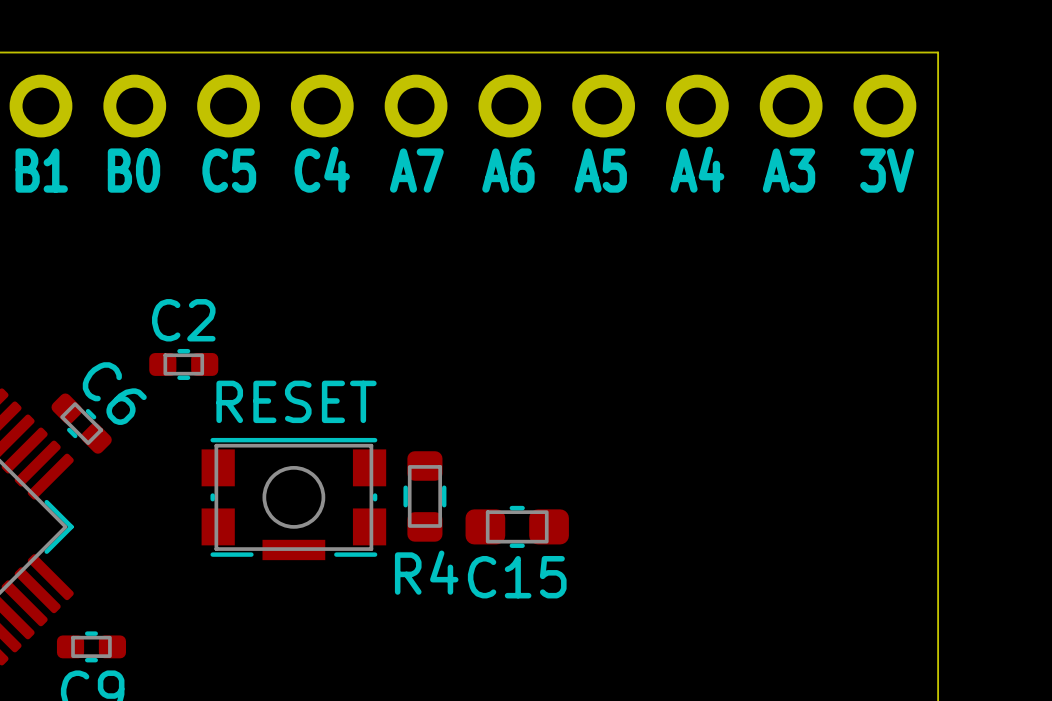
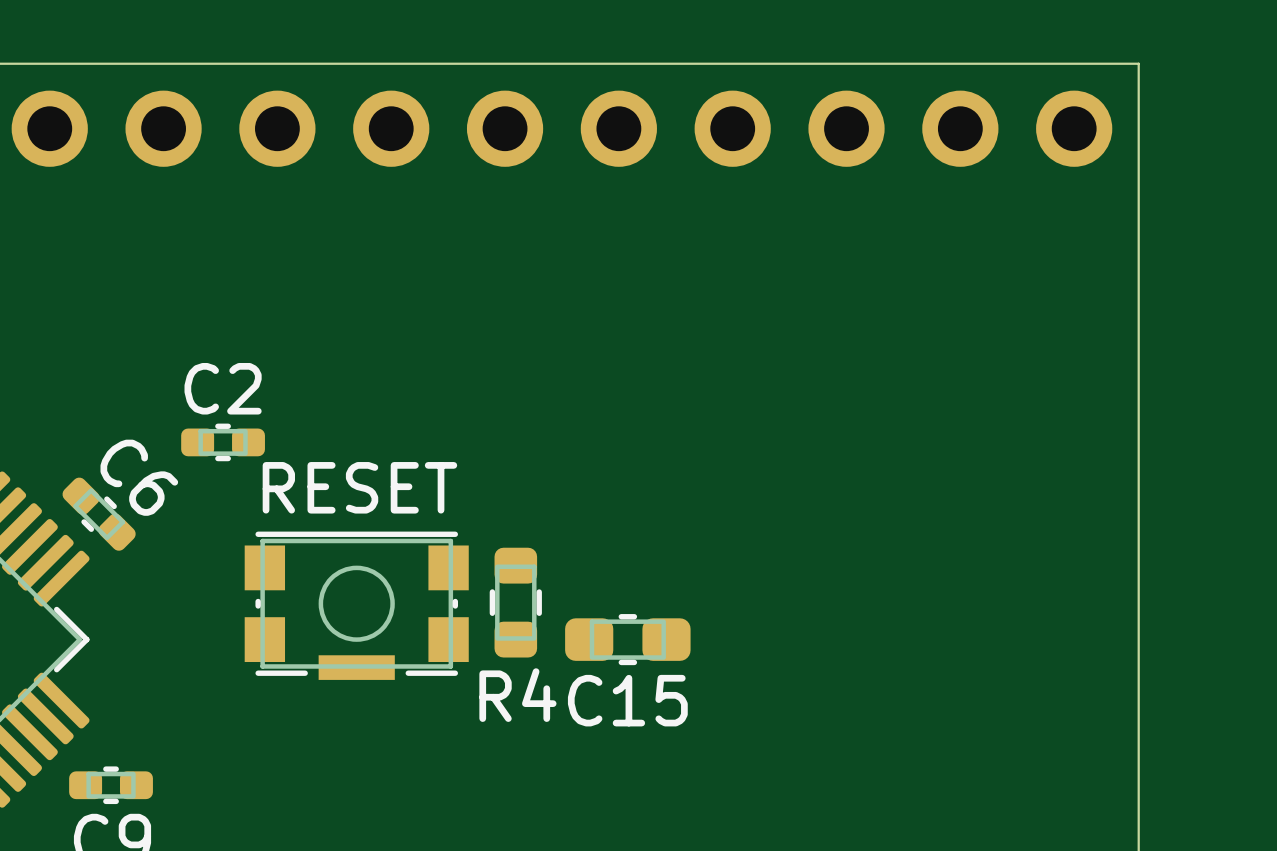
text: C4 (322, 169) -> none
text: A4 (697, 169) -> none
text: B1 (41, 170) -> none
text: B0 (133, 170) -> none
text: C5 (229, 170) -> none
text: A7 (416, 170) -> none
text: A6 (508, 170) -> none
text: A5 (600, 170) -> none
text: A3 (789, 170) -> none
text: 3V (887, 170) -> none

